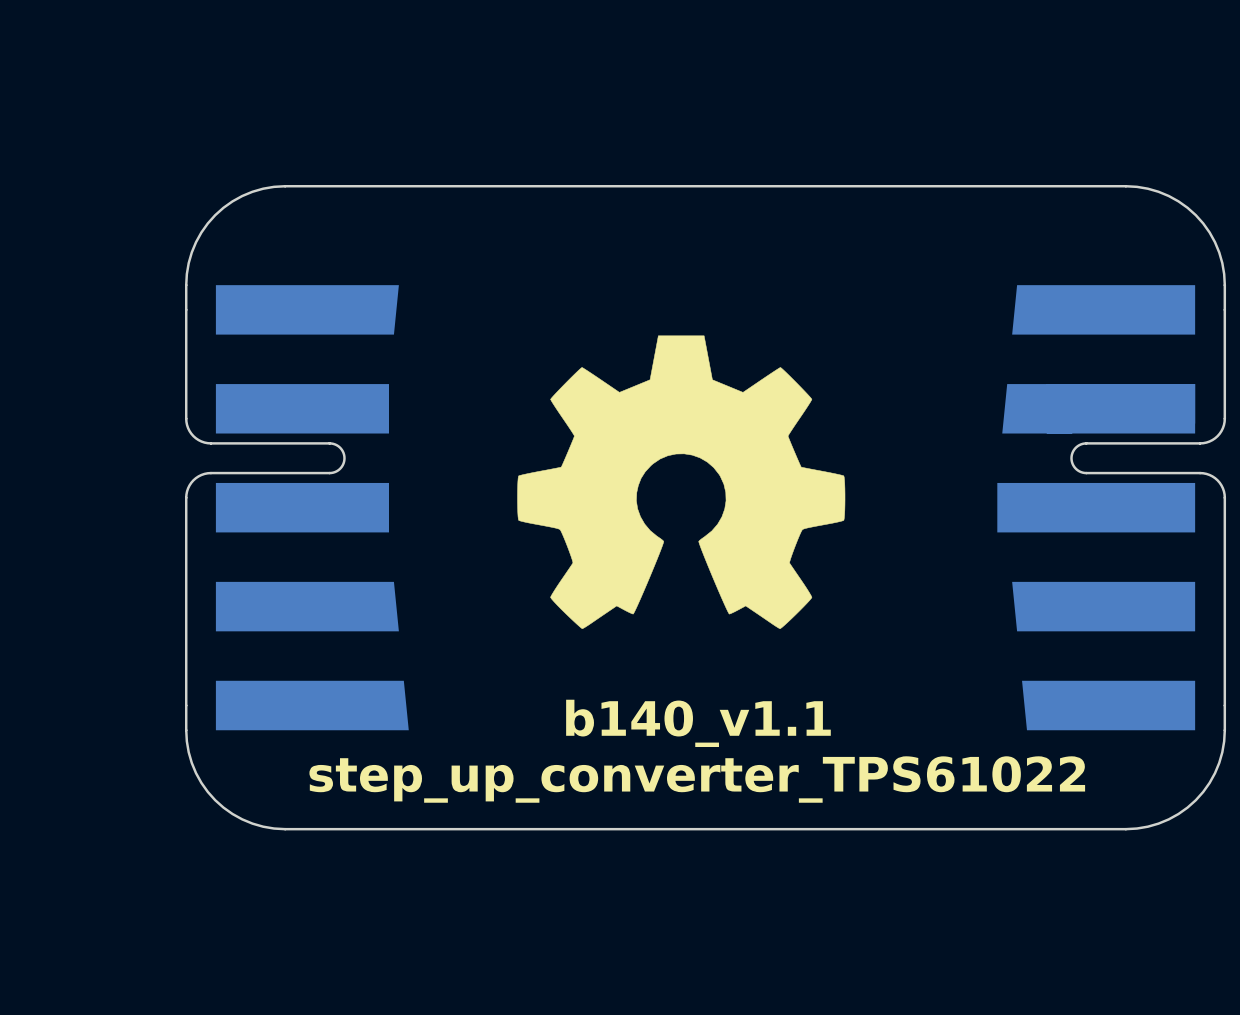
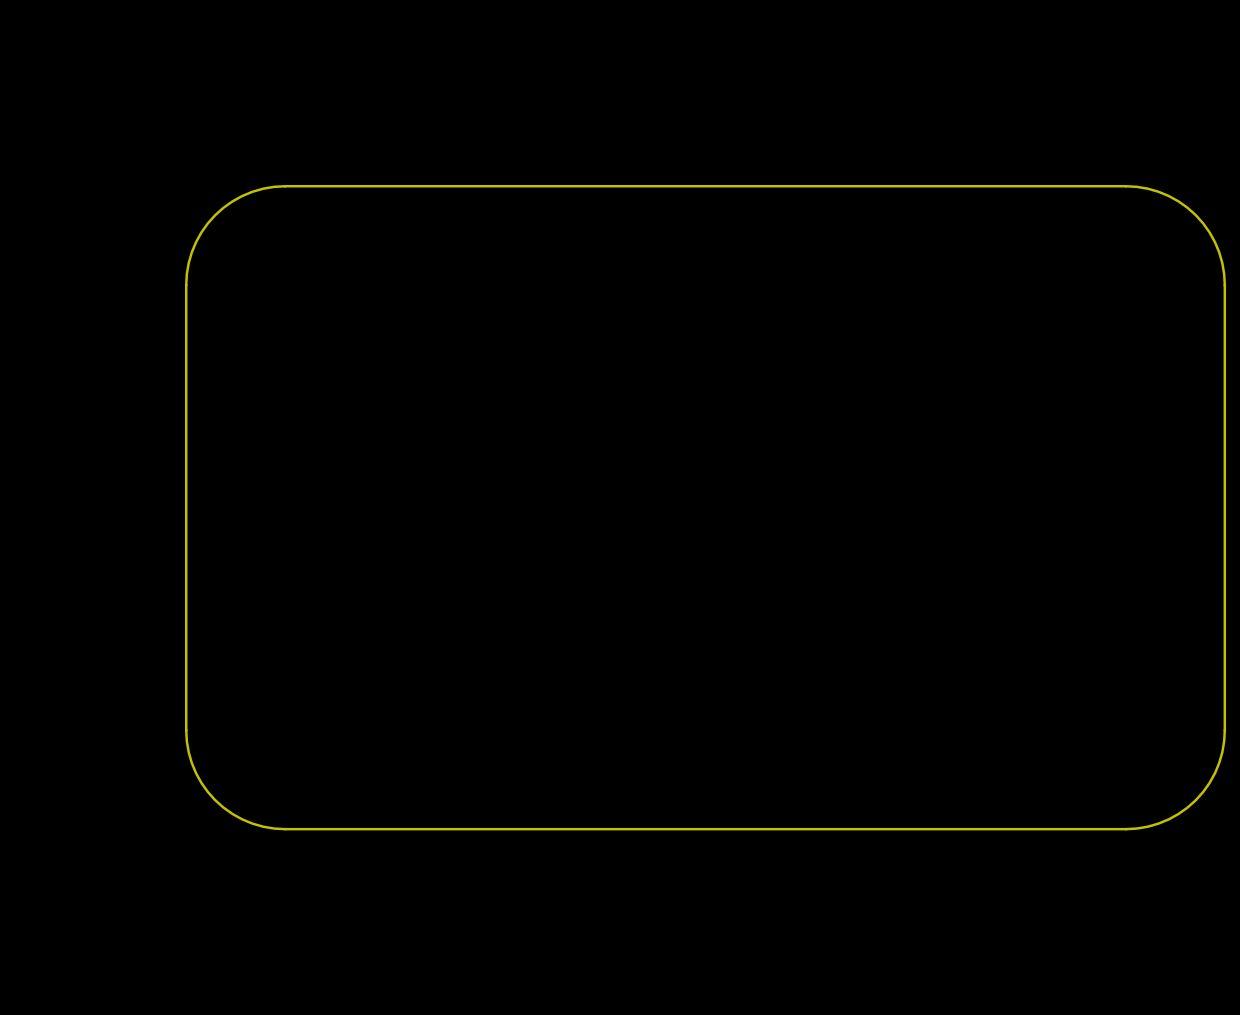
board edge: none -> (186, 309) (186, 705)
board edge: none -> (1224, 309) (1224, 705)
drawing: [517, 335, 846, 630] -> none
part: (296, 507) -> none
part: (1111, 507) -> none
text: b140_v1.1 (698, 723) -> none
text: step_up_converter_TPS61022 (697, 779) -> none

